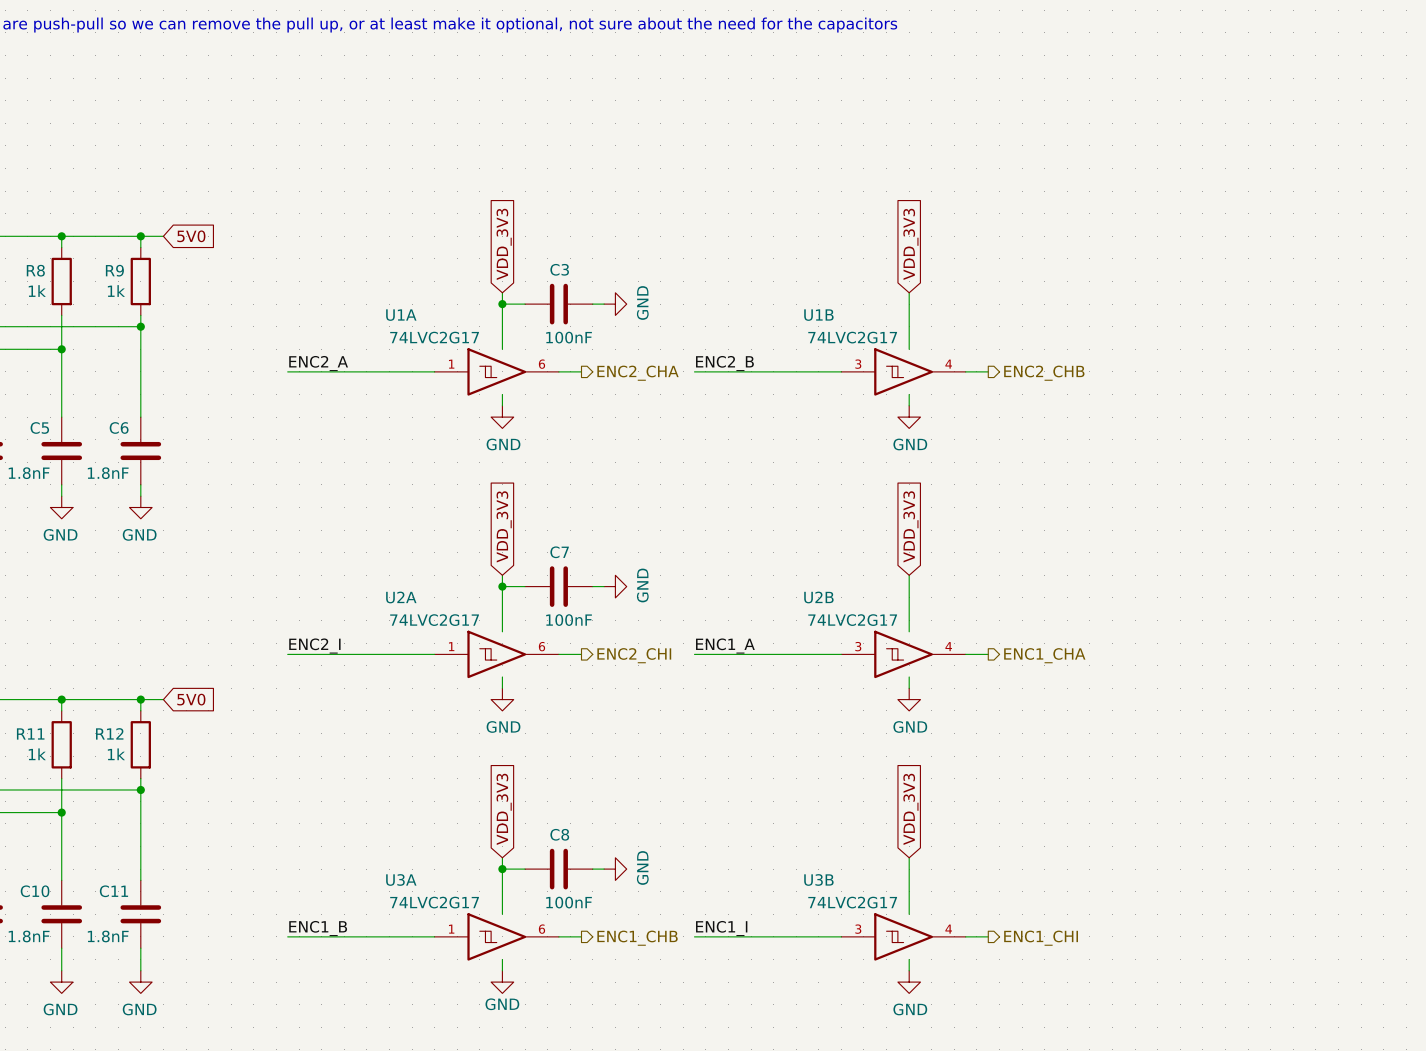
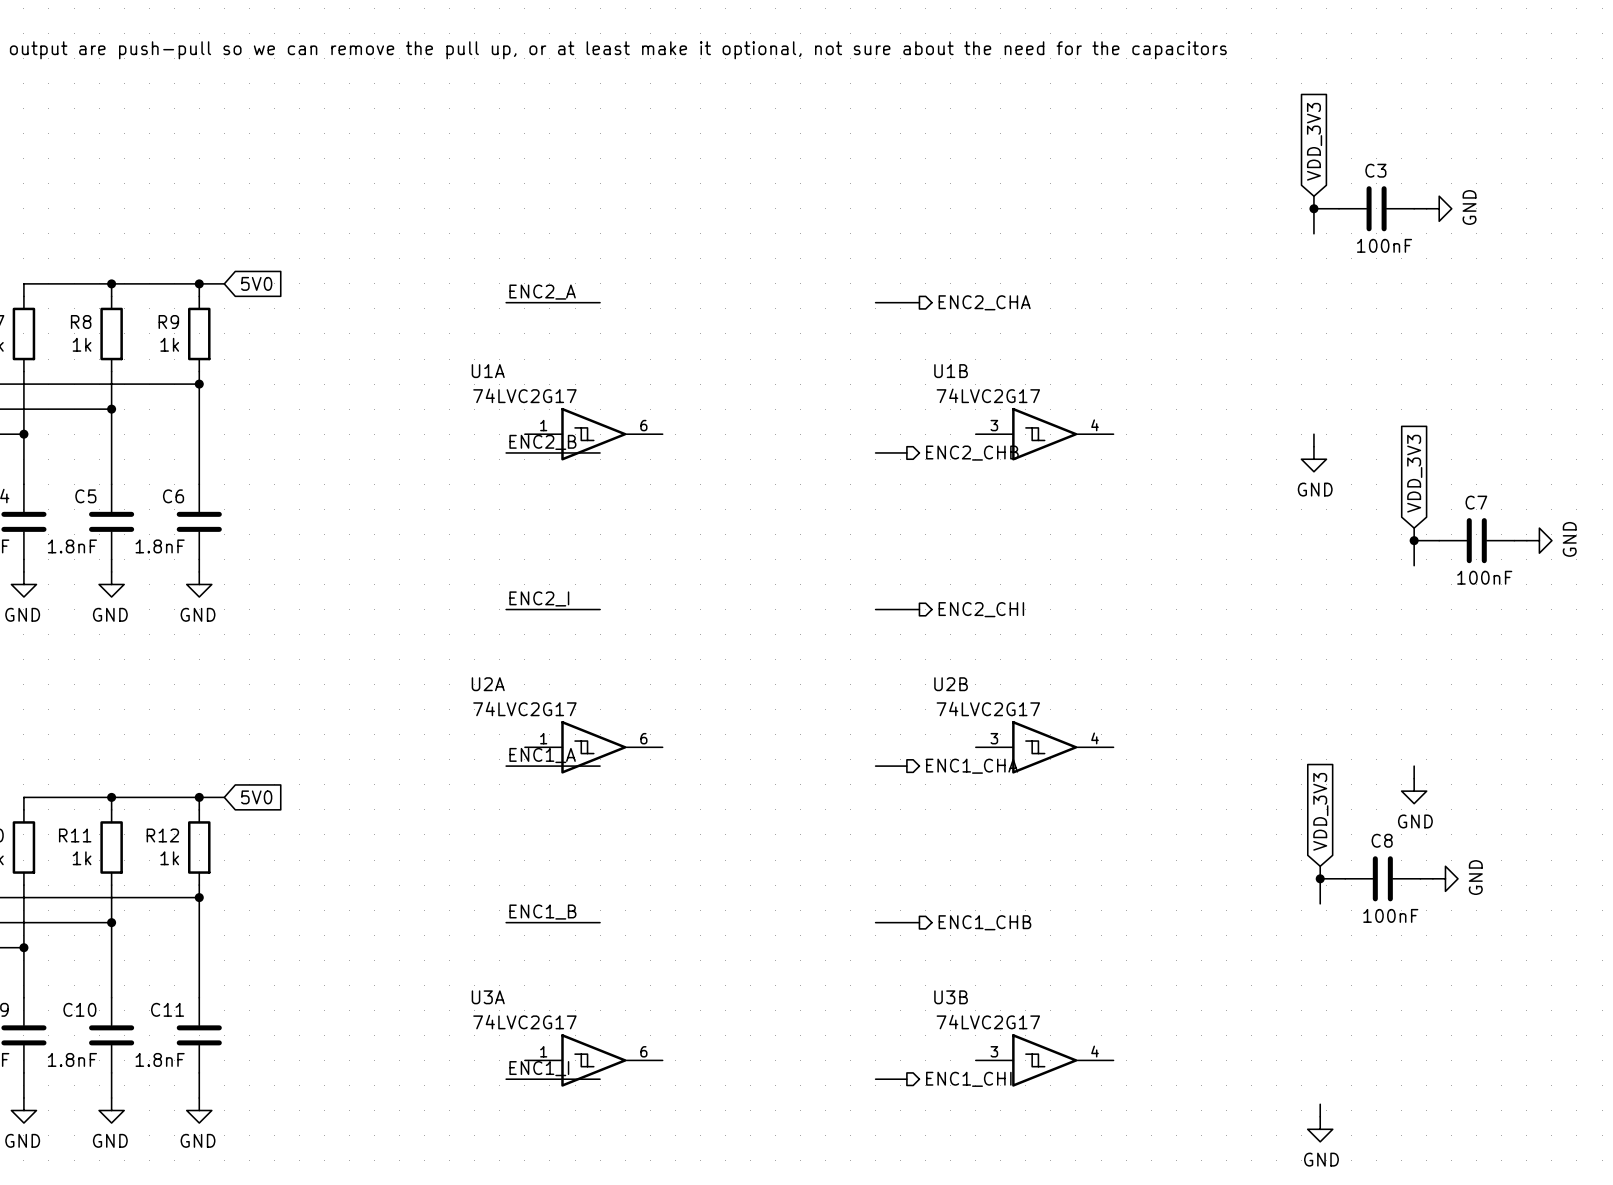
global label: none -> VDD_3V3 (1314, 141)
wire: none -> (1313, 196) (1313, 233)
wire: none -> (1313, 208) (1339, 208)
junction: none -> (1313, 208)
wire: none -> (1414, 208) (1426, 208)
power symbol: none -> GND (1439, 208)
global label: VDD_3V3 (504, 244) -> none
global label: VDD_3V3 (910, 244) -> none
wire: none -> (506, 302) (600, 302)
wire: none -> (875, 302) (919, 302)
hierarchical label: none -> ENC2_CHA (984, 302)
wire: (502, 292) (502, 349) -> none
wire: (909, 292) (909, 349) -> none
wire: (502, 304) (525, 304) -> none
junction: (502, 304) -> none
C3 position: (558, 304) -> (1376, 208)
wire: (592, 304) (604, 304) -> none
power symbol: GND (615, 304) -> none
label position: ENC2_A (318, 363) -> ENC2_A (542, 292)
label: ENC2_B (724, 363) -> none
wire: (287, 371) (434, 371) -> none
wire: (558, 371) (581, 371) -> none
wire: (694, 371) (841, 371) -> none
wire: (965, 371) (988, 371) -> none
wire: none -> (1313, 434) (1313, 446)
hierarchical label: ENC2_CHA (638, 373) -> none
hierarchical label position: ENC2_CHB (1044, 373) -> ENC2_CHB (972, 453)
label: none -> ENC2_B (542, 442)
wire: none -> (506, 452) (600, 452)
wire: none -> (875, 452) (906, 452)
wire: (502, 394) (502, 405) -> none
wire: (909, 394) (909, 405) -> none
power symbol: none -> GND (1313, 459)
global label: none -> VDD_3V3 (1414, 473)
power symbol: GND (502, 417) -> none
power symbol: GND (909, 417) -> none
wire: none -> (1414, 528) (1414, 565)
wire: none -> (1414, 540) (1439, 540)
junction: none -> (1414, 540)
wire: none -> (1514, 540) (1526, 540)
power symbol: none -> GND (1539, 540)
global label: VDD_3V3 (504, 526) -> none
global label: VDD_3V3 (910, 526) -> none
wire: none -> (506, 609) (600, 609)
wire: none -> (875, 609) (919, 609)
hierarchical label: none -> ENC2_CHI (981, 609)
wire: (502, 575) (502, 631) -> none
wire: (909, 575) (909, 631) -> none
wire: (502, 586) (525, 586) -> none
junction: (502, 586) -> none
C7 position: (558, 586) -> (1476, 540)
wire: (592, 586) (604, 586) -> none
power symbol: GND (615, 586) -> none
label position: ENC2_I (314, 646) -> ENC2_I (539, 598)
label: ENC1_A (725, 646) -> none
wire: (287, 654) (434, 654) -> none
wire: (558, 654) (581, 654) -> none
wire: (694, 654) (841, 654) -> none
wire: (965, 654) (988, 654) -> (1320, 878) (1345, 878)
hierarchical label: ENC2_CHI (634, 655) -> none
hierarchical label position: ENC1_CHA (1044, 655) -> ENC1_CHA (972, 766)
label: none -> ENC1_A (542, 755)
wire: none -> (506, 766) (600, 766)
wire: none -> (875, 766) (906, 766)
wire: none -> (1414, 766) (1414, 778)
wire: (502, 676) (502, 688) -> none
wire: (909, 676) (909, 688) -> none
power symbol: none -> GND (1414, 791)
power symbol: GND (502, 699) -> none
power symbol: GND (909, 699) -> none
global label: none -> VDD_3V3 (1320, 811)
wire: none -> (1320, 866) (1320, 903)
junction: none -> (1320, 878)
wire: none -> (1420, 878) (1432, 878)
power symbol: none -> GND (1445, 878)
global label: VDD_3V3 (504, 809) -> none
global label: VDD_3V3 (910, 809) -> none
wire: none -> (506, 922) (600, 922)
wire: none -> (875, 922) (919, 922)
hierarchical label: none -> ENC1_CHB (984, 922)
wire: (502, 857) (502, 914) -> none
wire: (909, 857) (909, 914) -> none
wire: (502, 869) (525, 869) -> none
junction: (502, 869) -> none
C8 position: (558, 869) -> (1382, 878)
wire: (592, 869) (604, 869) -> none
power symbol: GND (615, 869) -> none
label position: ENC1_B (318, 928) -> ENC1_B (542, 912)
label: ENC1_I (721, 928) -> none
wire: (287, 936) (434, 936) -> none
wire: (558, 936) (581, 936) -> none
wire: (694, 936) (841, 936) -> none
wire: (965, 936) (988, 936) -> none
hierarchical label: ENC1_CHB (637, 938) -> none
hierarchical label position: ENC1_CHI (1041, 938) -> ENC1_CHI (968, 1079)
label: none -> ENC1_I (539, 1068)
wire: none -> (506, 1079) (600, 1079)
wire: none -> (875, 1079) (906, 1079)
wire: (502, 959) (502, 970) -> none
wire: (909, 959) (909, 970) -> none
wire: none -> (1320, 1104) (1320, 1116)
power symbol: GND (502, 982) -> none
power symbol: GND (909, 982) -> none
power symbol: none -> GND (1320, 1129)

